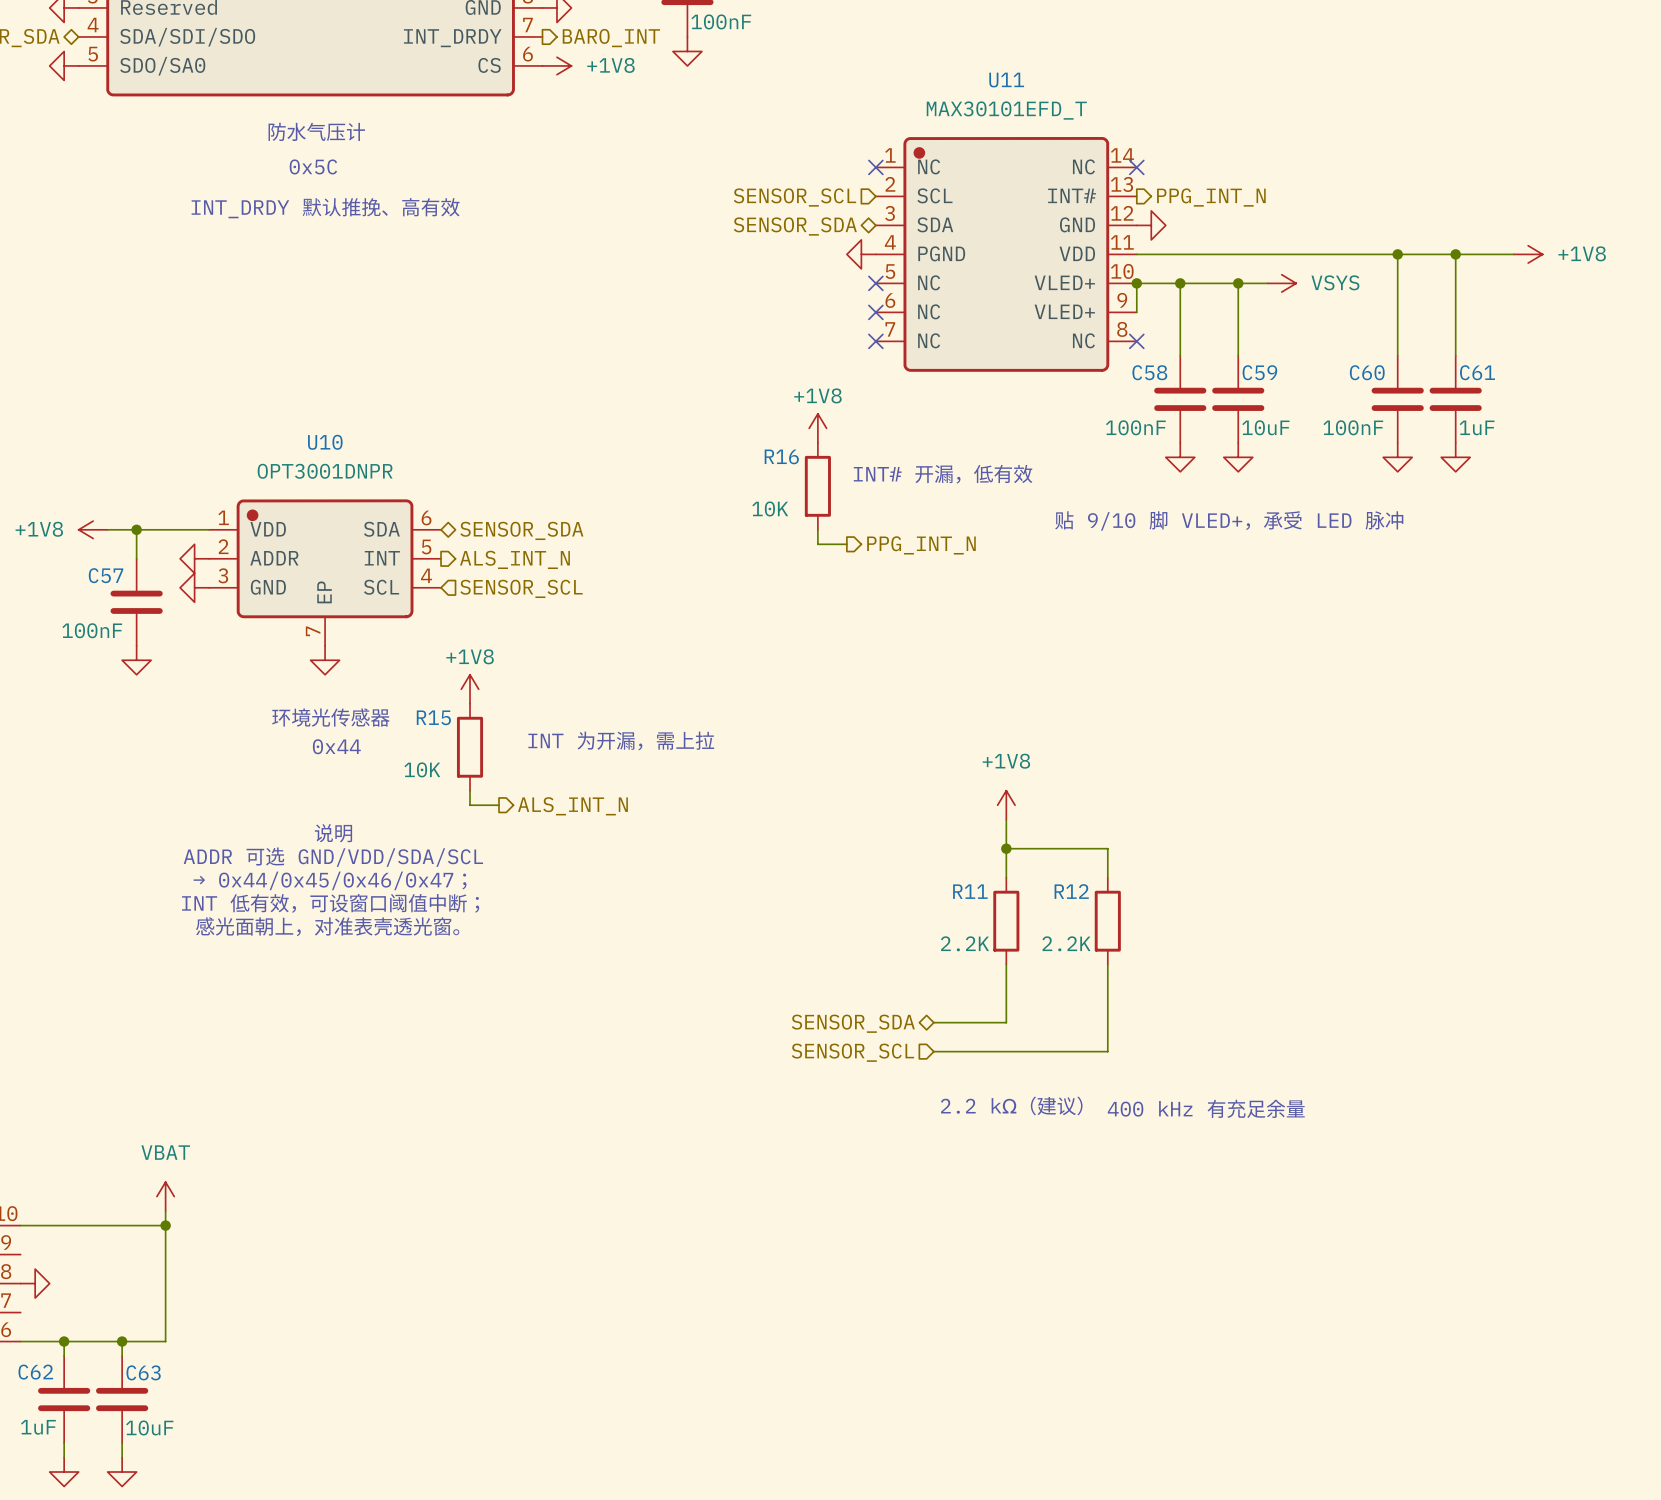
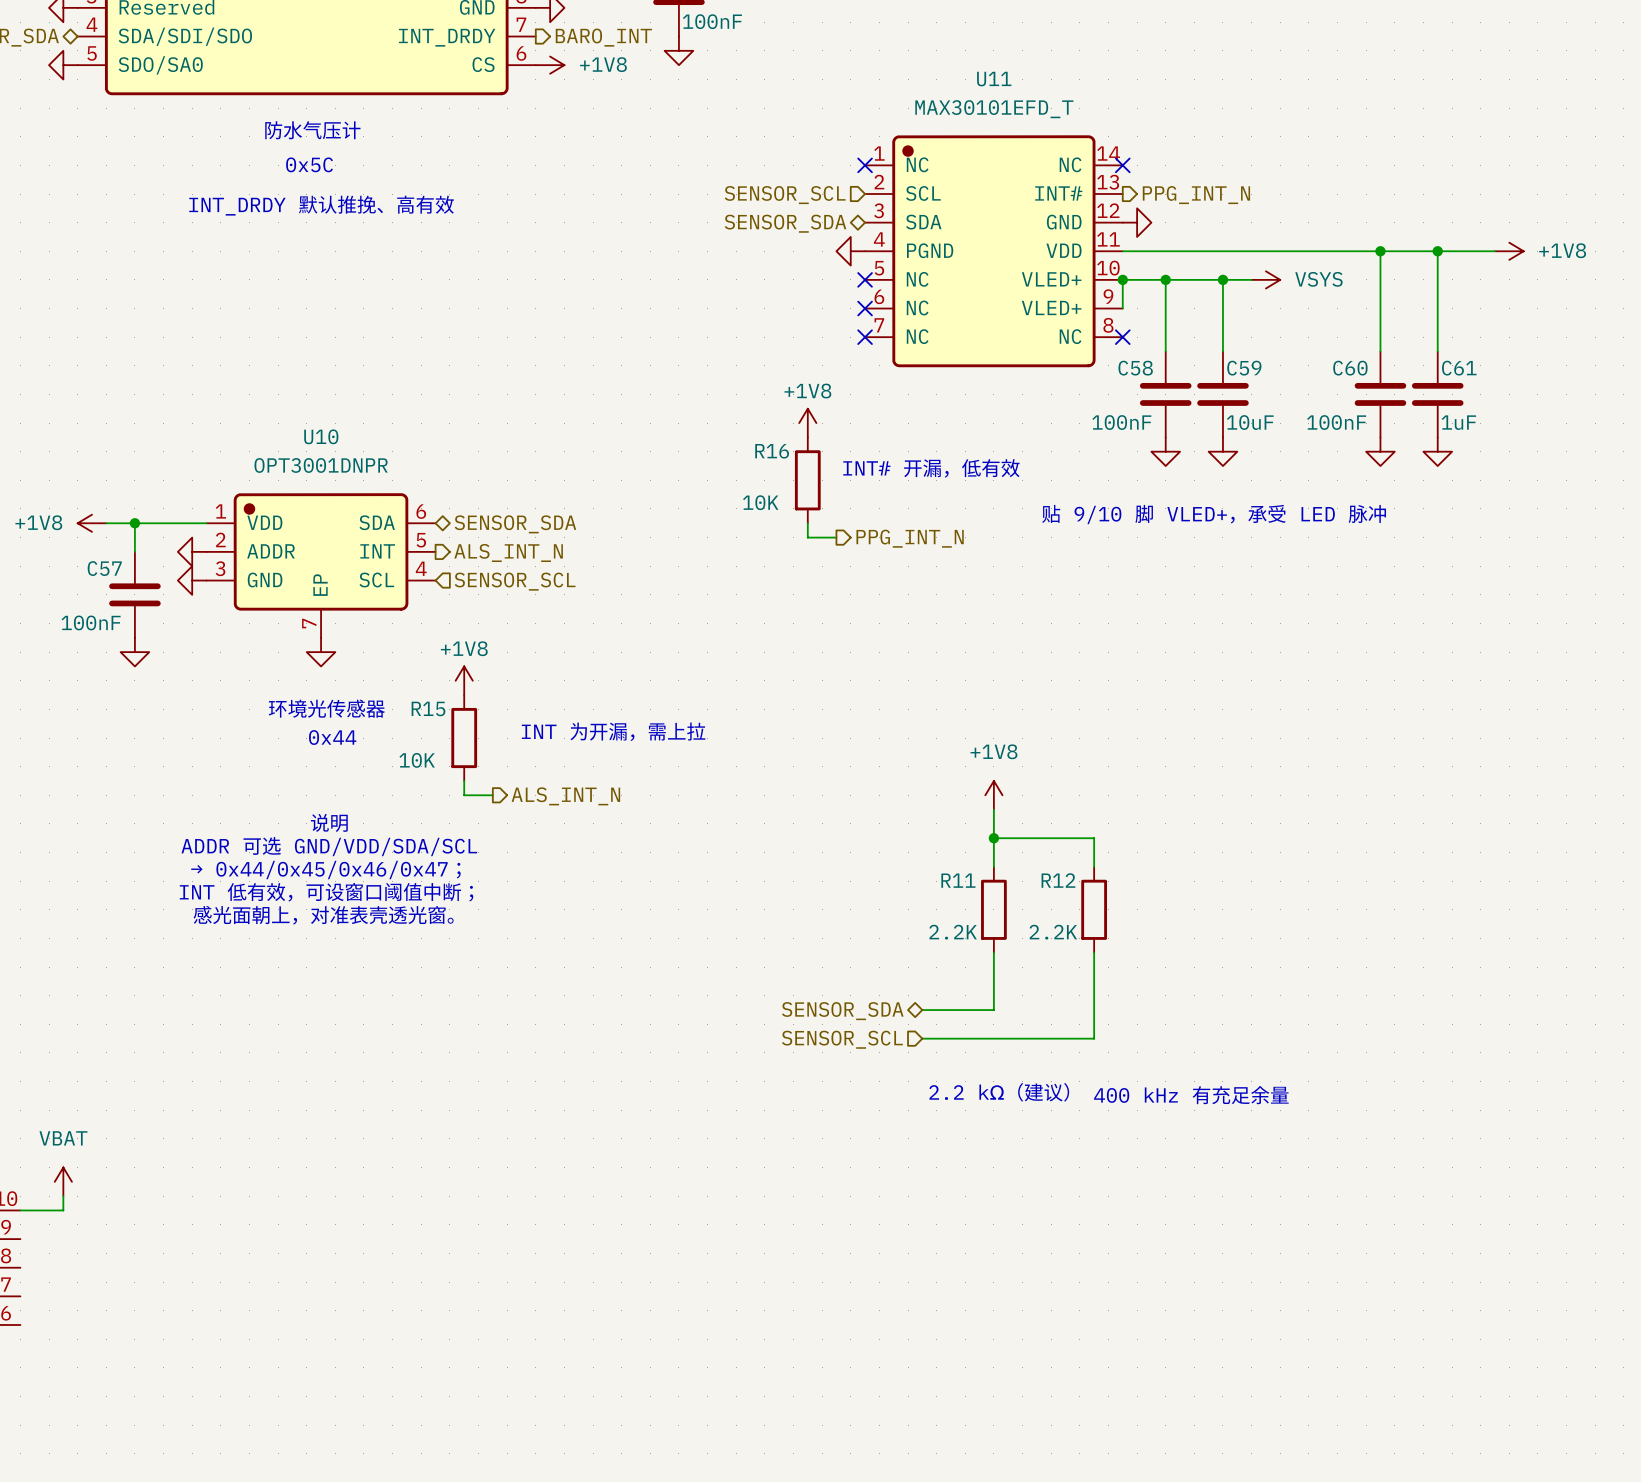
power symbol position: VBAT (165, 1196) -> VBAT (63, 1181)
wire: (165, 1211) (165, 1341) (20, 1341) -> none
wire: (64, 1225) (165, 1225) -> (63, 1210) (63, 1196)
junction: (165, 1225) -> none
power symbol: (35, 1283) -> none
wire: (64, 1341) (64, 1356) -> none
junction: (64, 1341) -> none
wire: (122, 1341) (122, 1356) -> none
junction: (122, 1341) -> none
C62: 1uF (64, 1399) -> none
C63: 10uF (122, 1399) -> none
wire: (64, 1443) (64, 1457) -> none
wire: (122, 1443) (122, 1457) -> none
power symbol: (64, 1472) -> none
power symbol: (122, 1472) -> none

